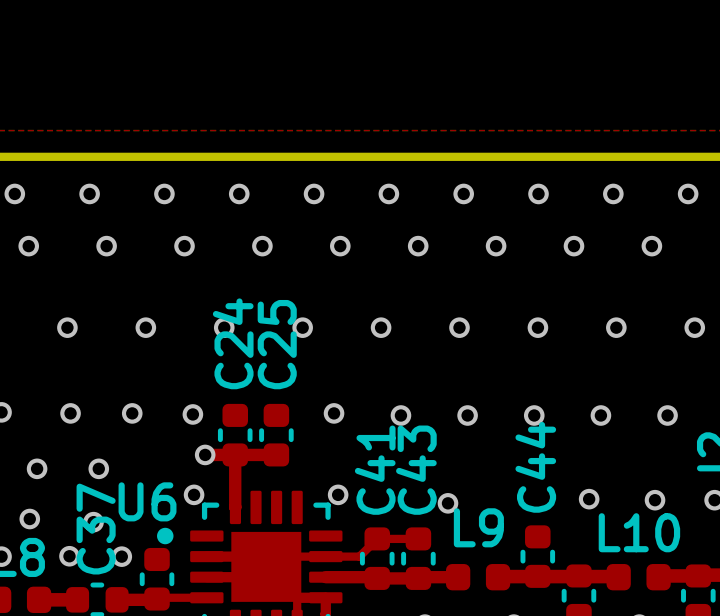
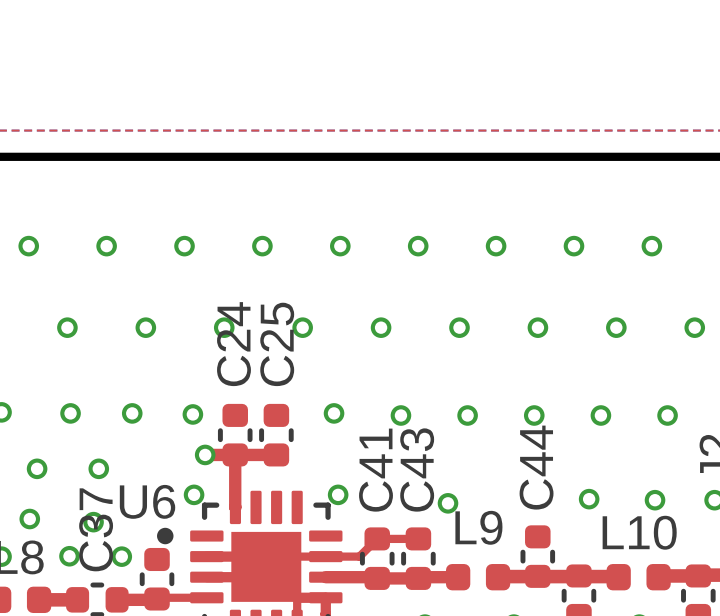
via: (14, 193) -> none
via: (89, 193) -> none
via: (164, 193) -> none
via: (239, 193) -> none
via: (314, 193) -> none
via: (388, 193) -> none
via: (463, 193) -> none
via: (538, 193) -> none
via: (613, 193) -> none
via: (688, 193) -> none

